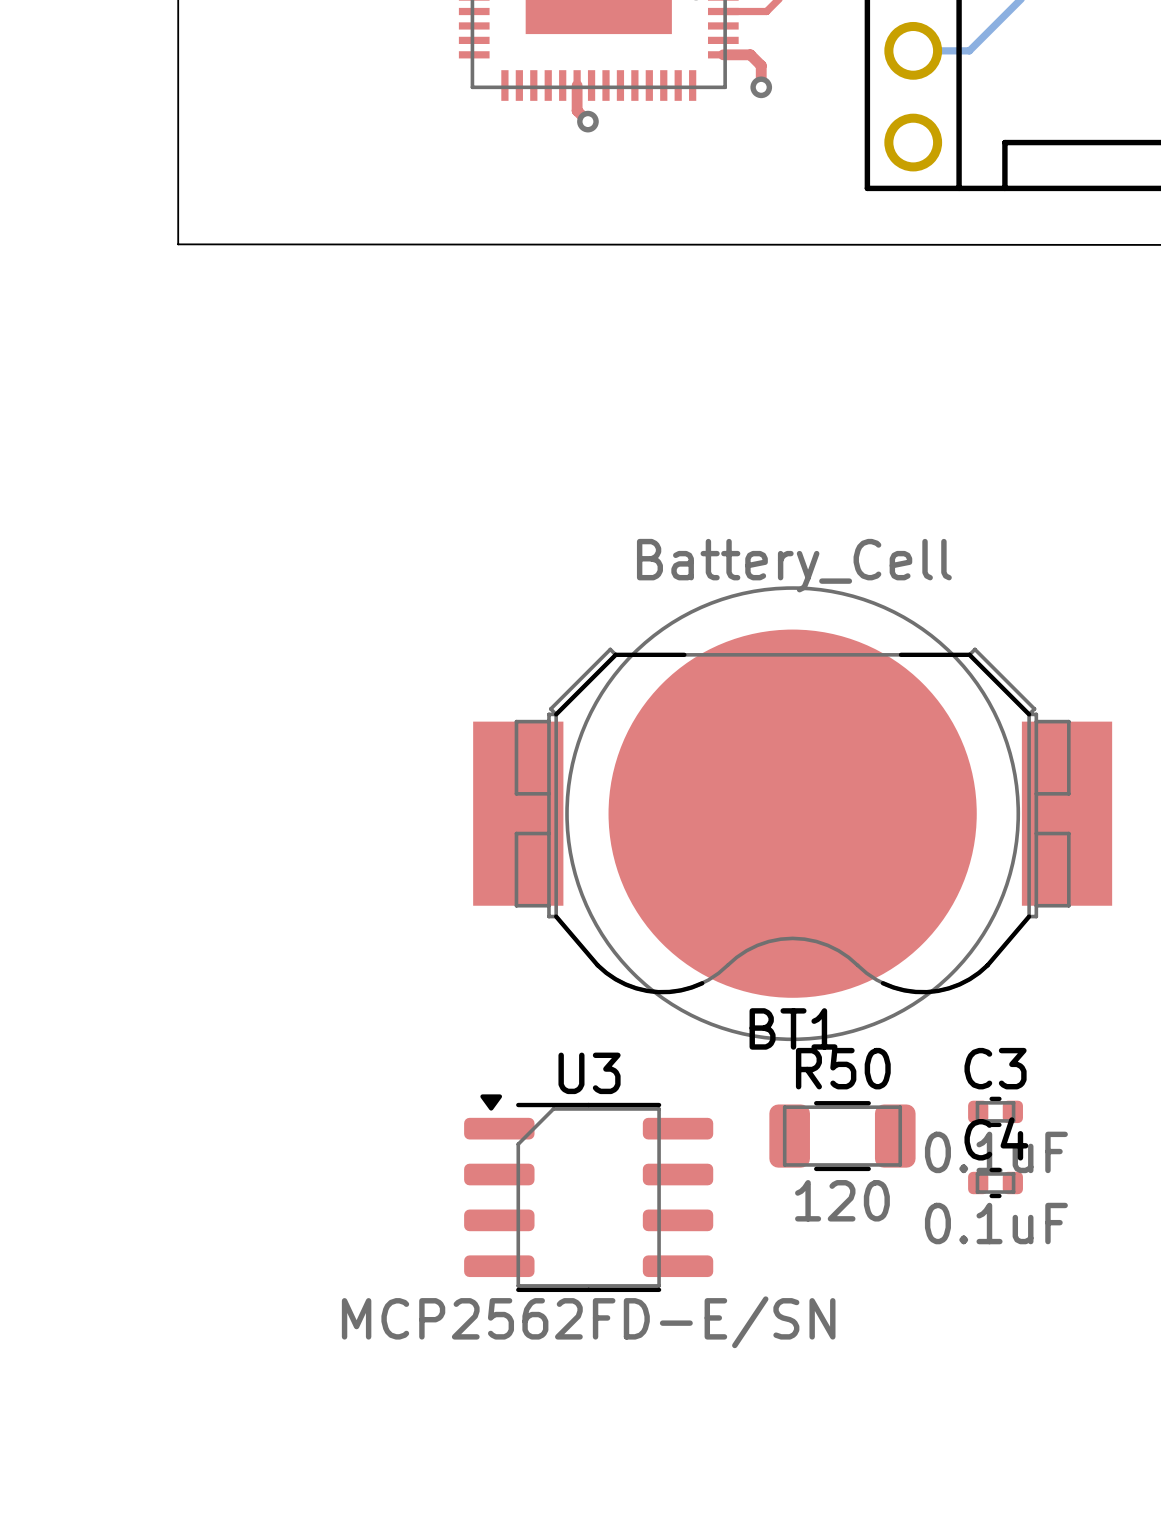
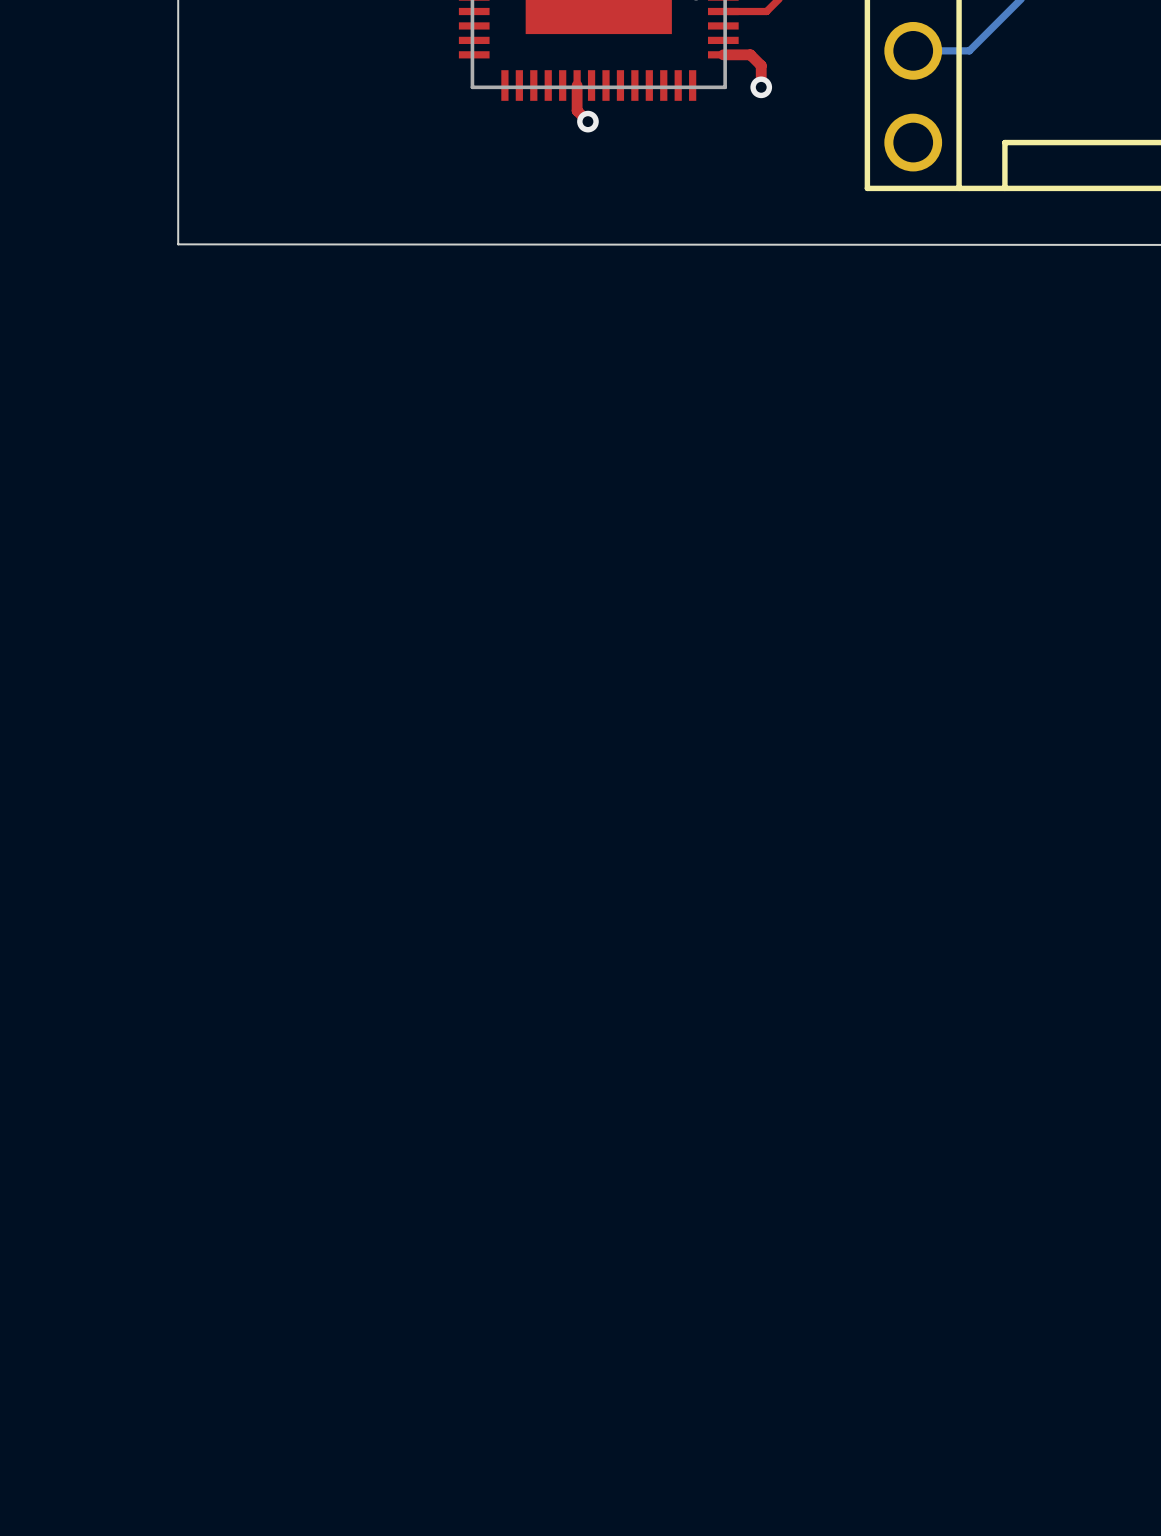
BT1: Battery_Cell (792, 813) -> none
C3: 0.1uF (995, 1111) -> none
R50: 120 (842, 1136) -> none
C4: 0.1uF (995, 1183) -> none
U3: MCP2562FD-E/SN (588, 1193) -> none

